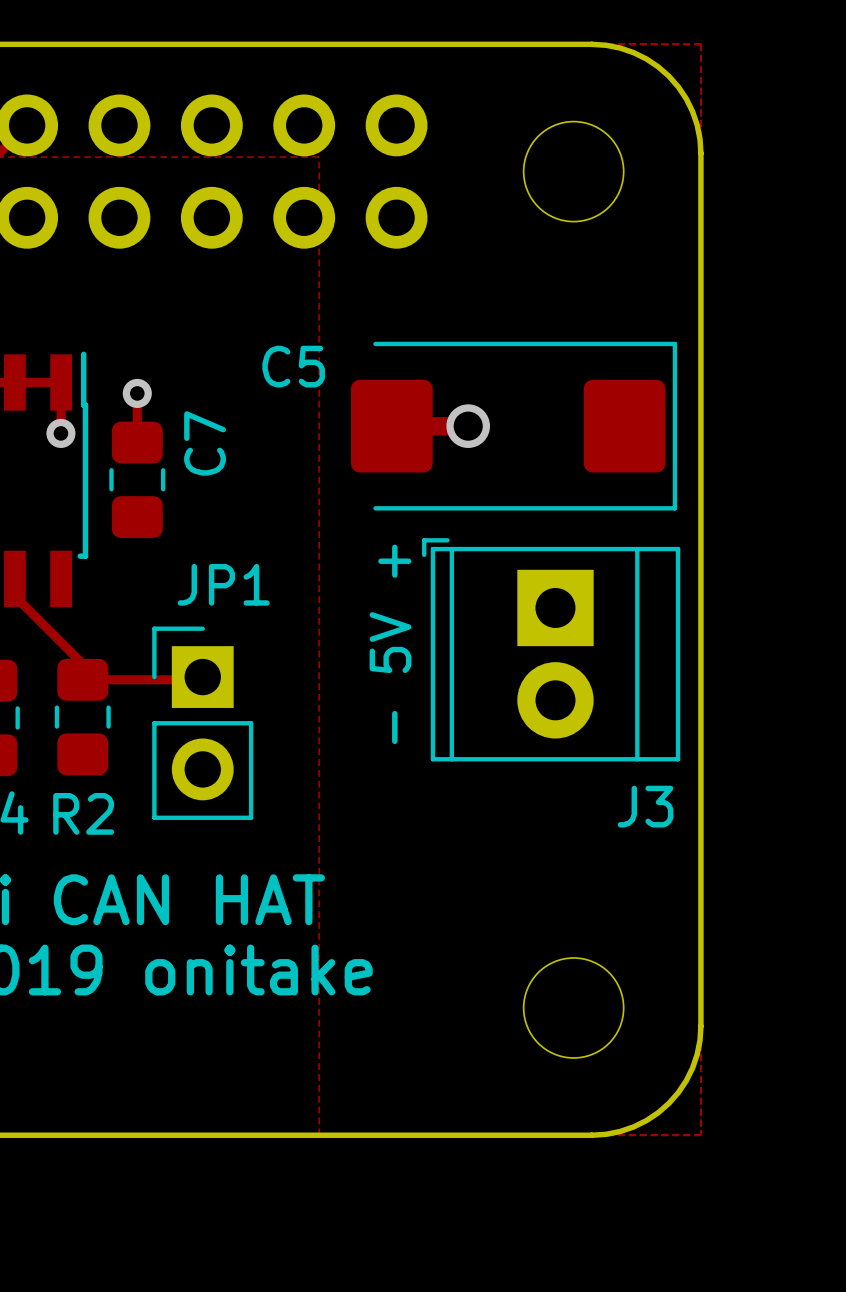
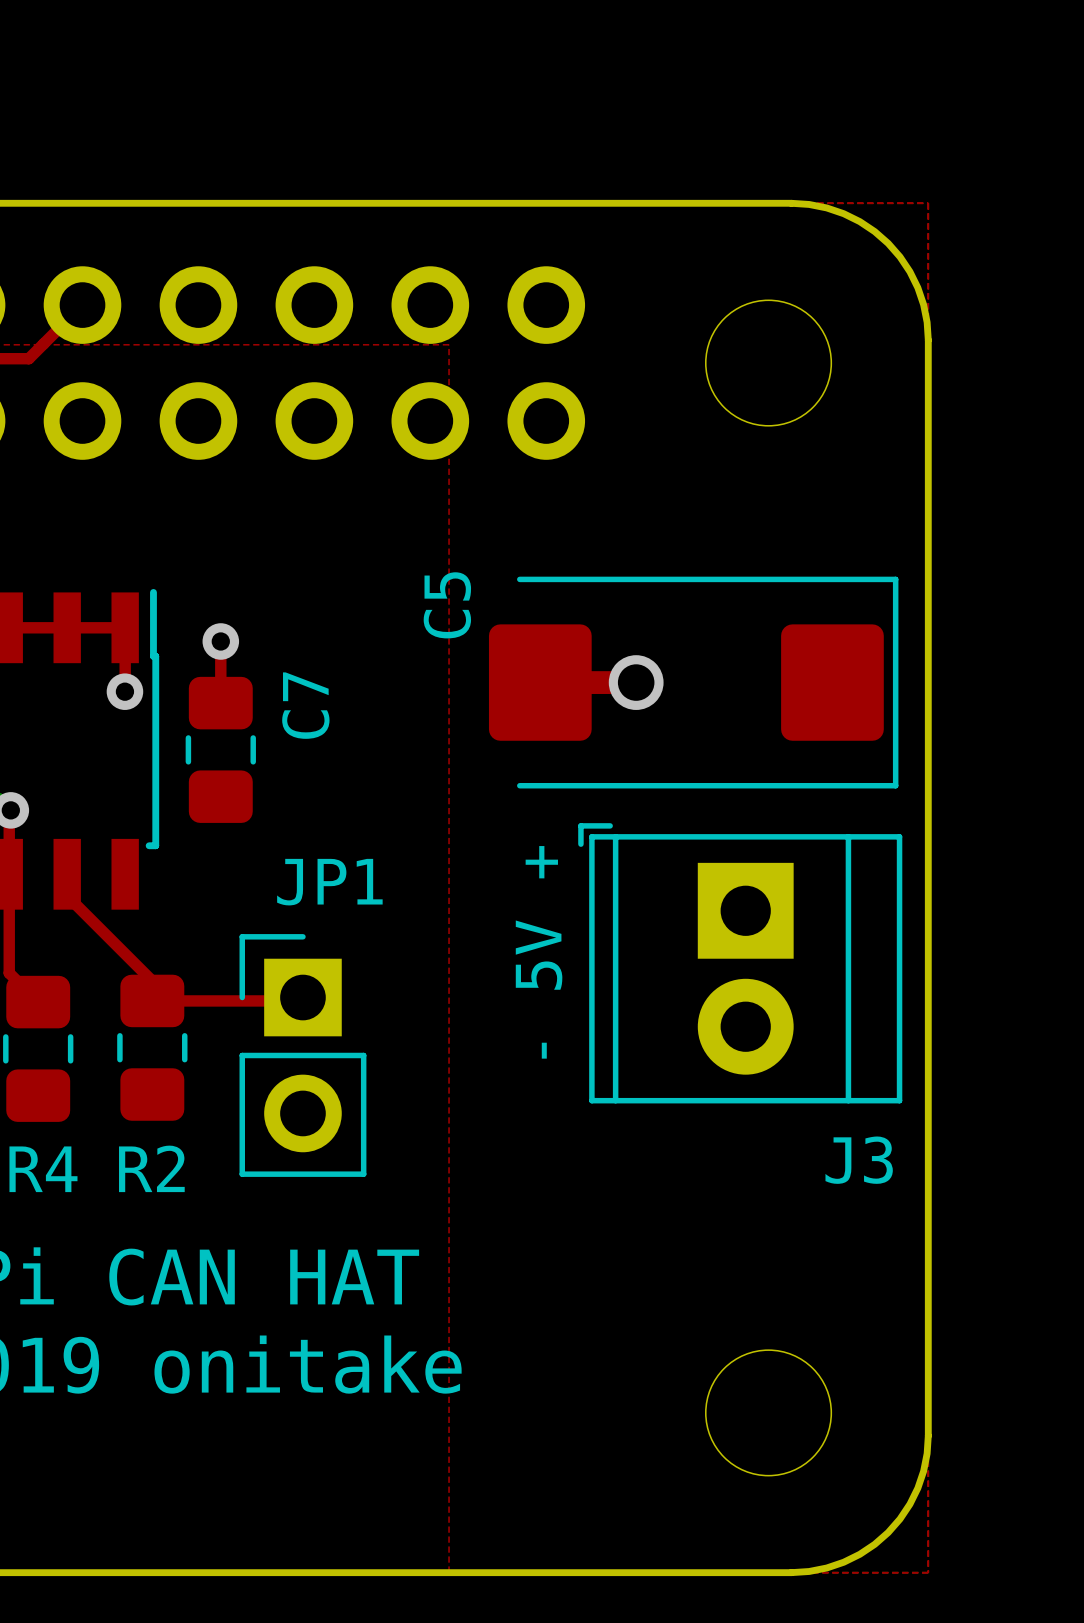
C5 name rotation: 0° (293, 366) -> 90° counterclockwise (447, 605)

